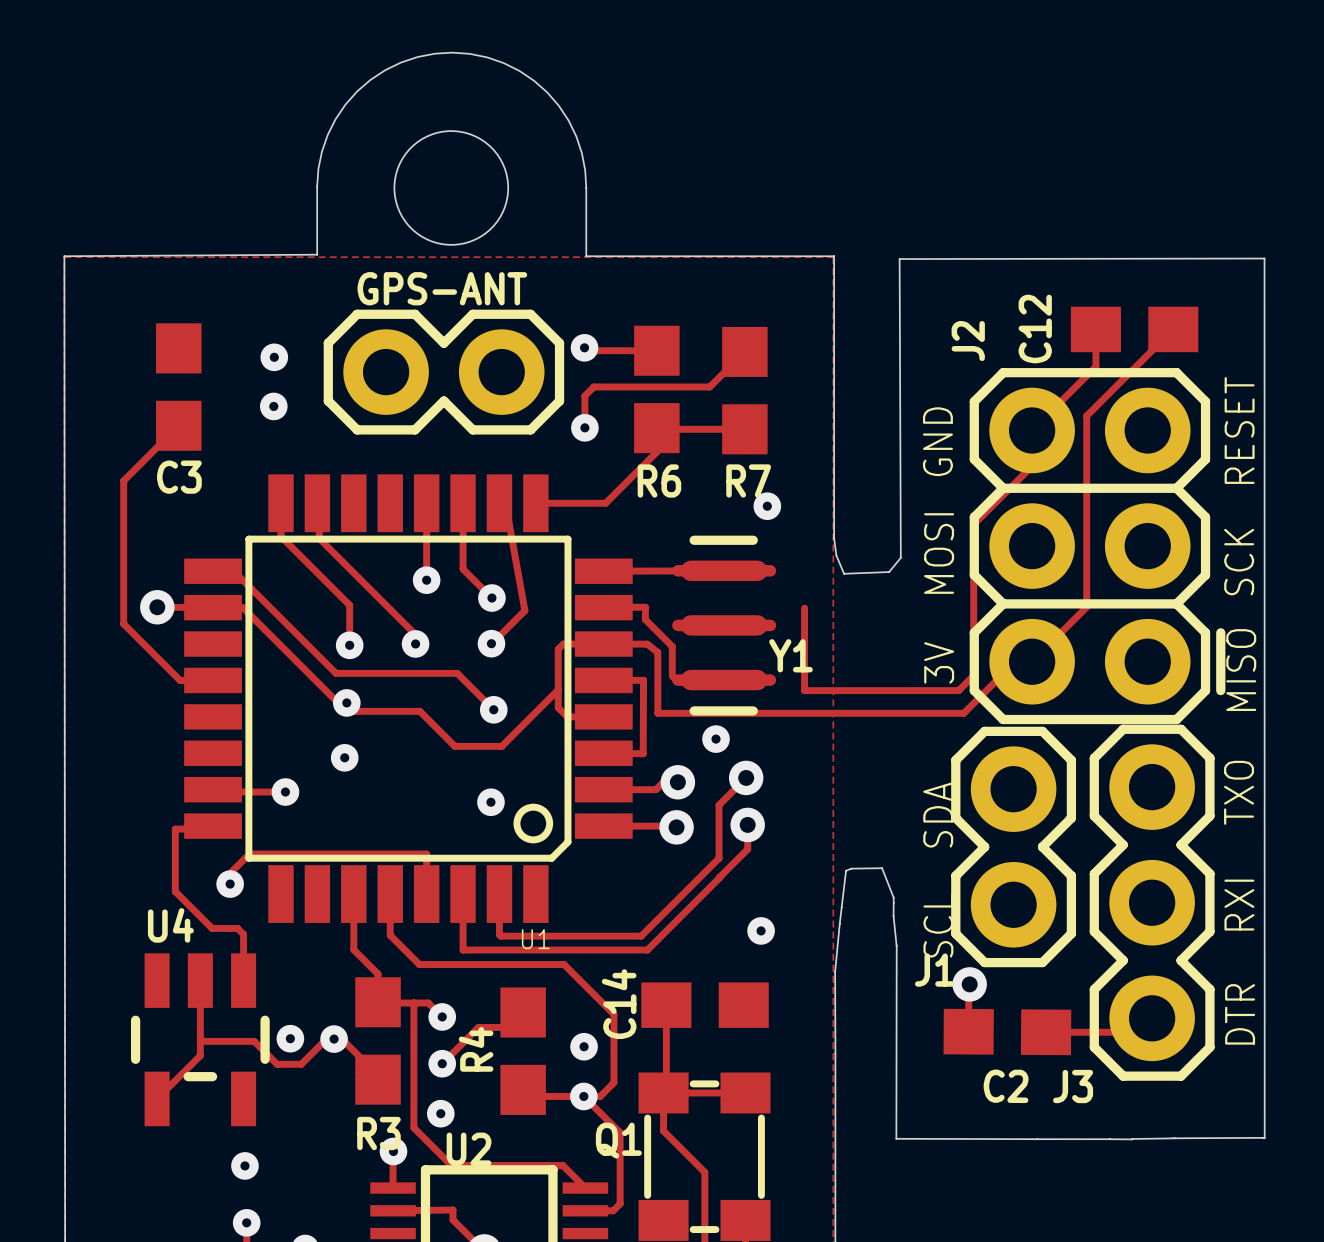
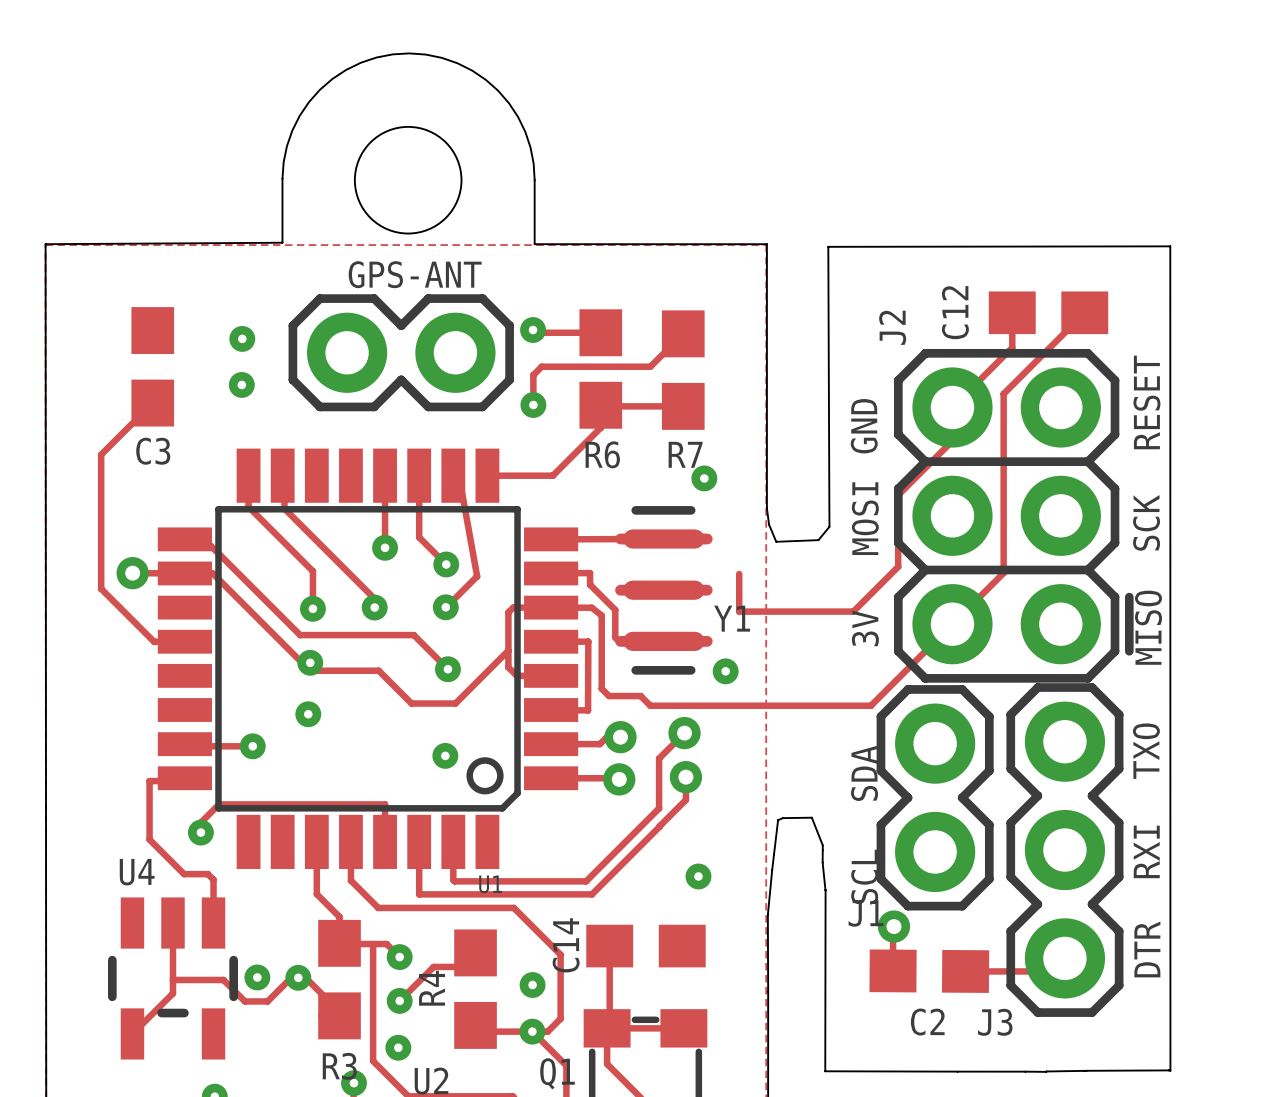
track: (973, 524) (973, 675) (958, 690) (804, 690) (804, 648) -> (898, 495) (898, 566) (853, 611) (739, 611)
track: (1032, 661) (1015, 661) (963, 713) (657, 713) -> (952, 624) (870, 705) (650, 705) (640, 696) (609, 696) (601, 688) (601, 672)
via position: (716, 739) -> (725, 671)

